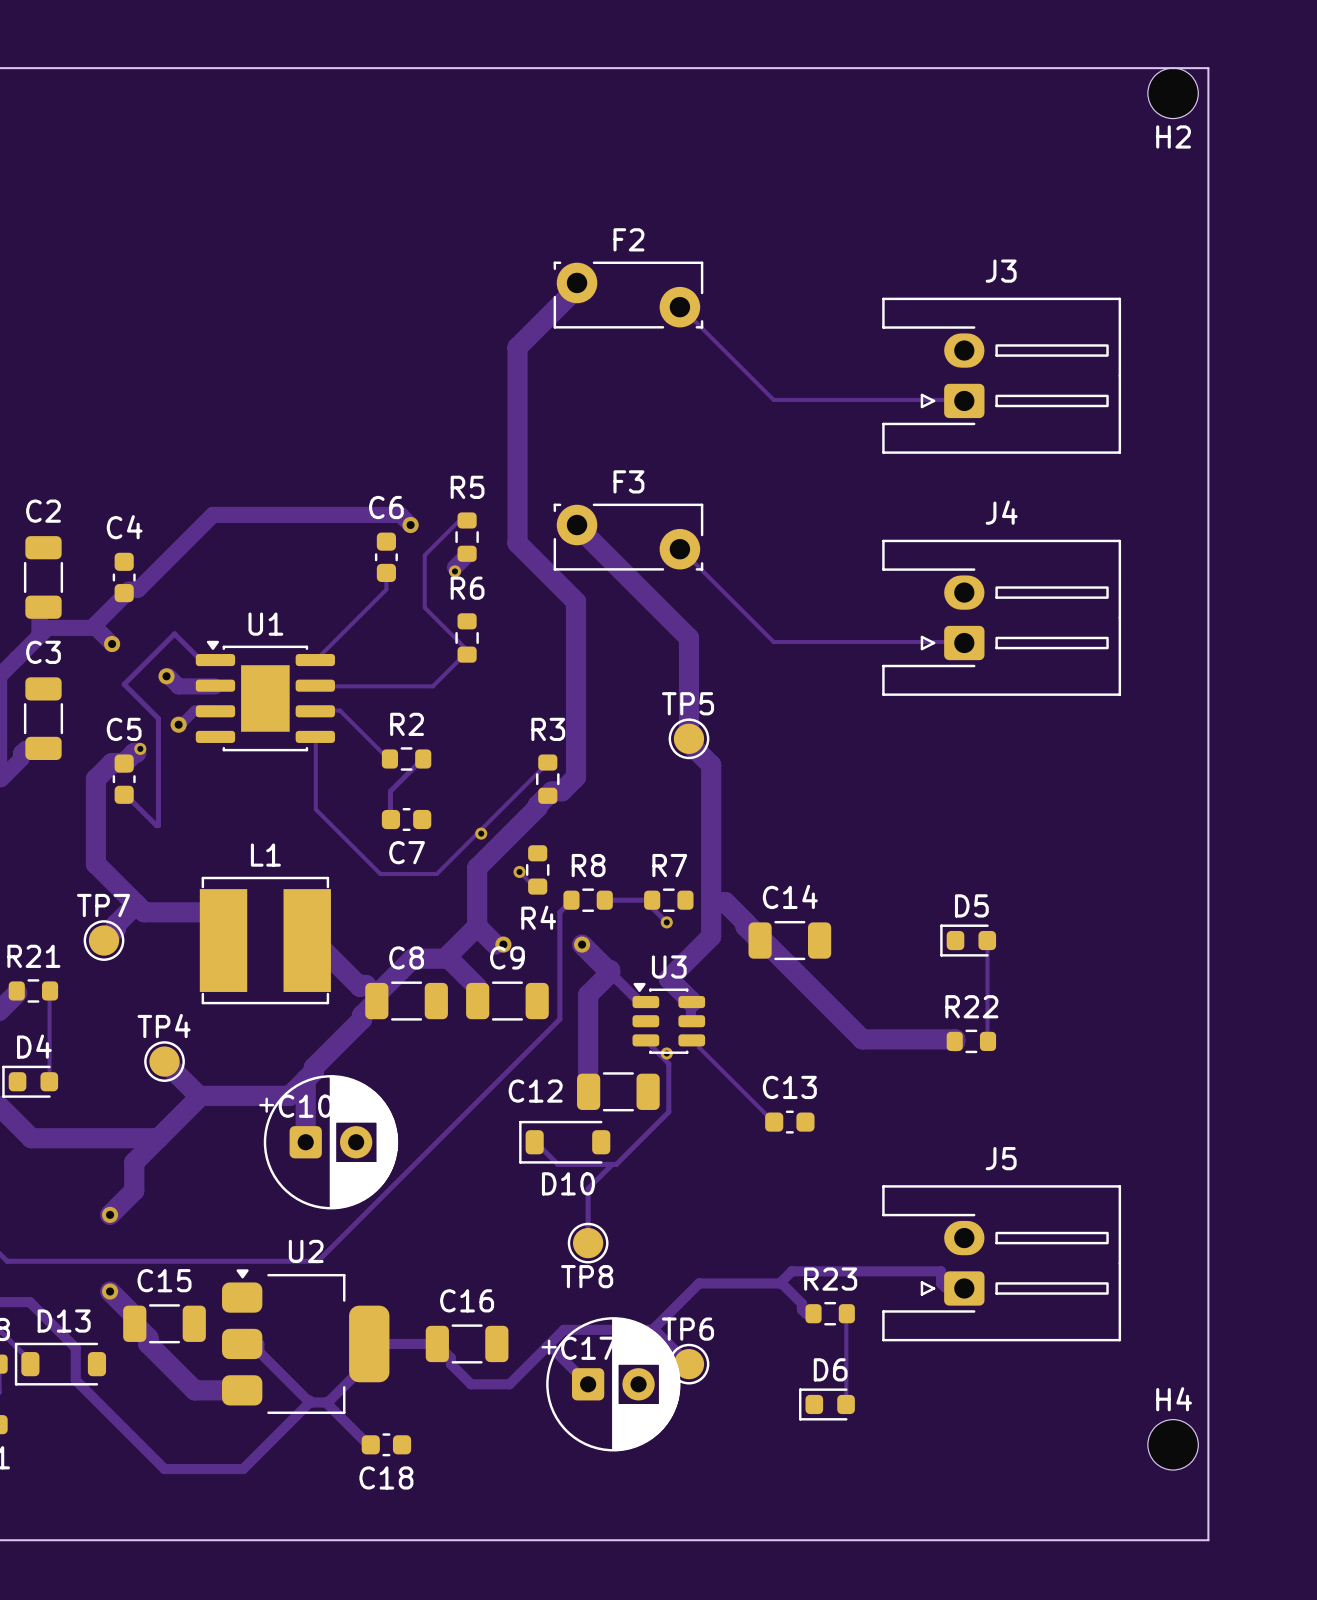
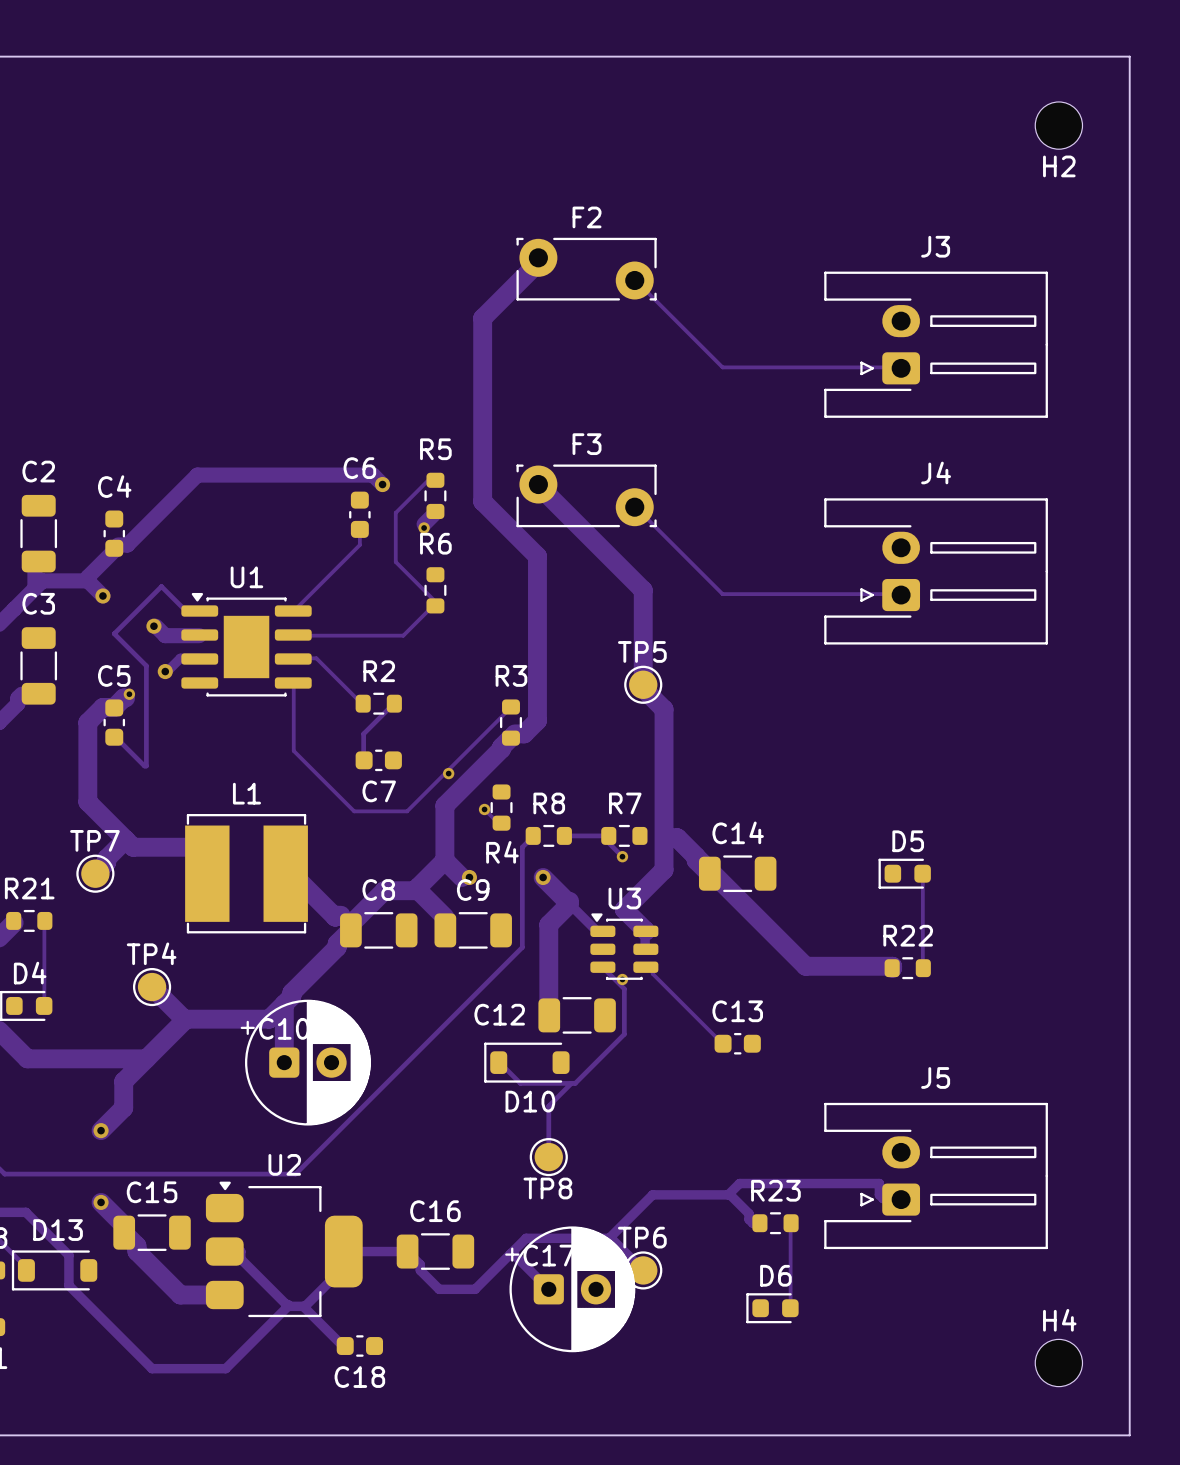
H2 position: (1173, 93) -> (1058, 125)
H4 position: (1173, 1444) -> (1058, 1363)

